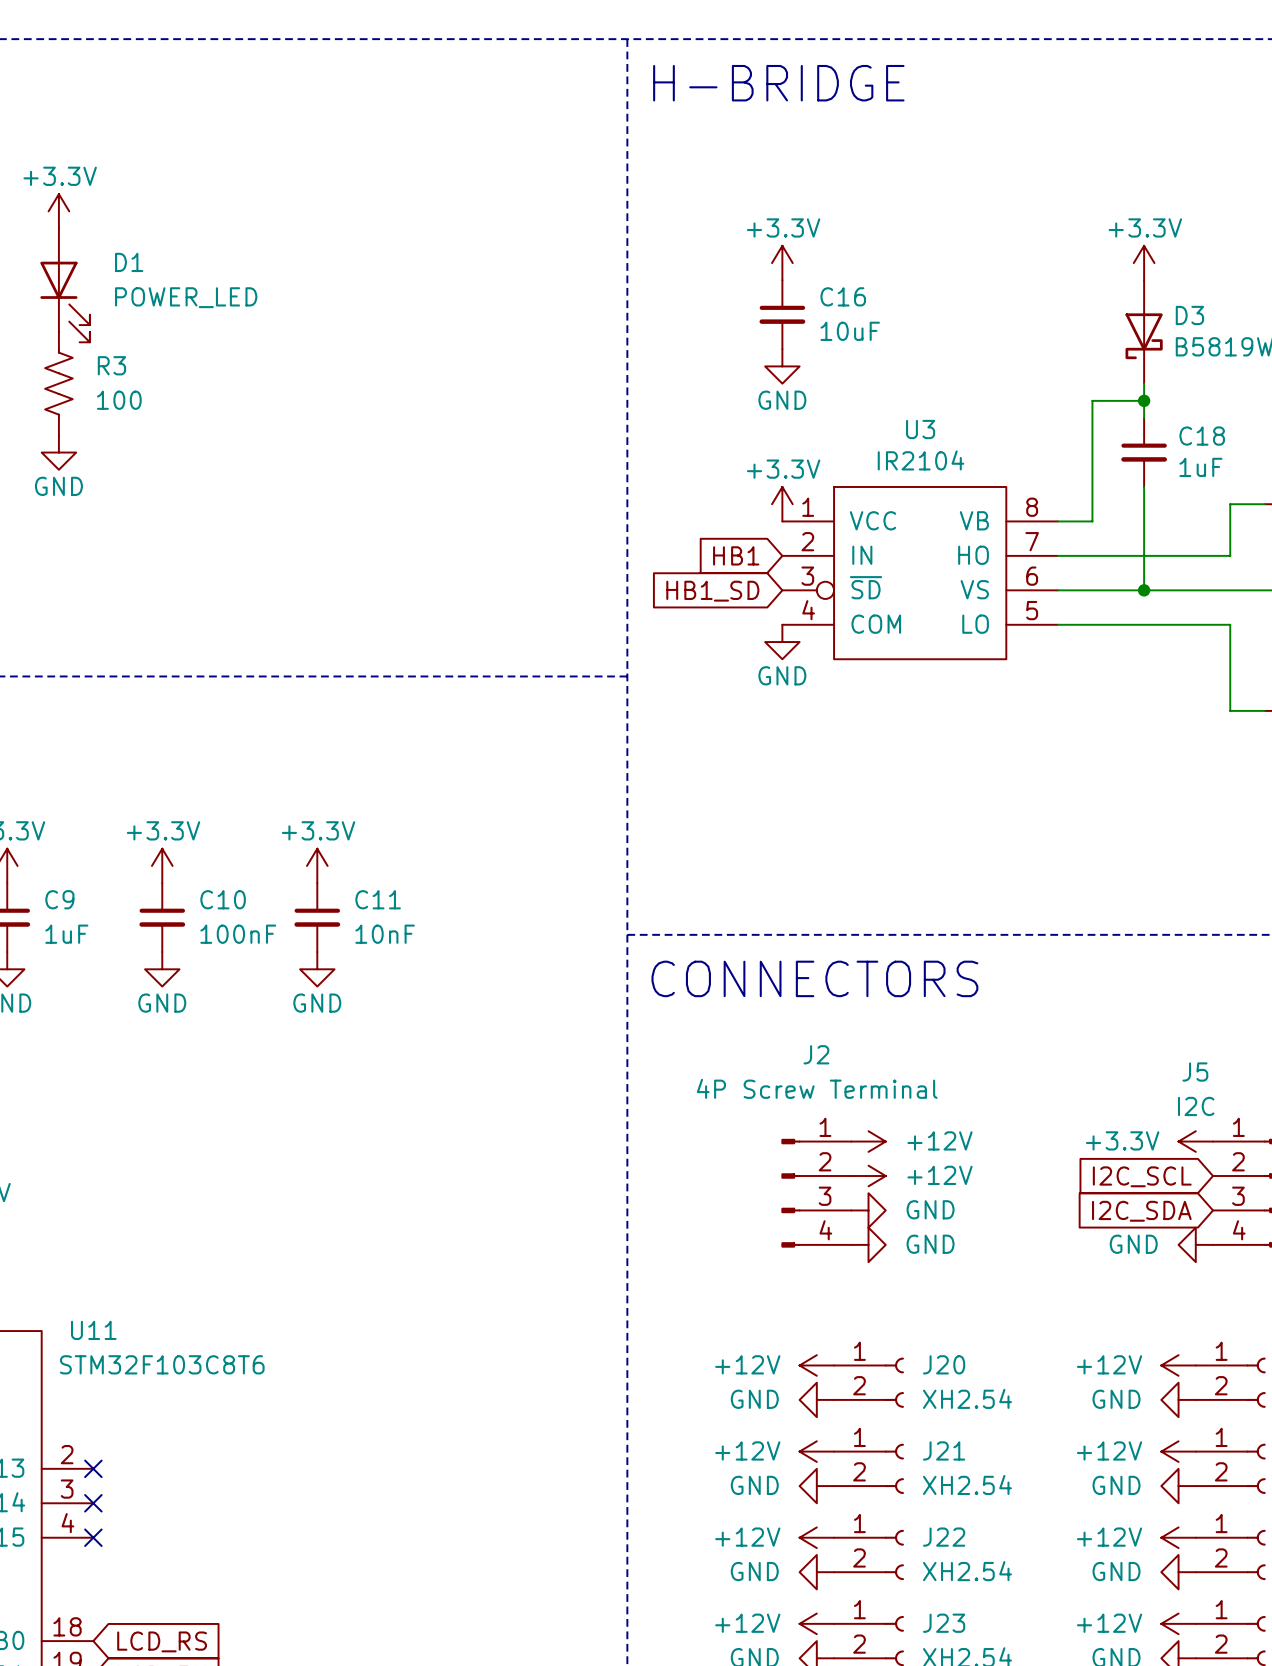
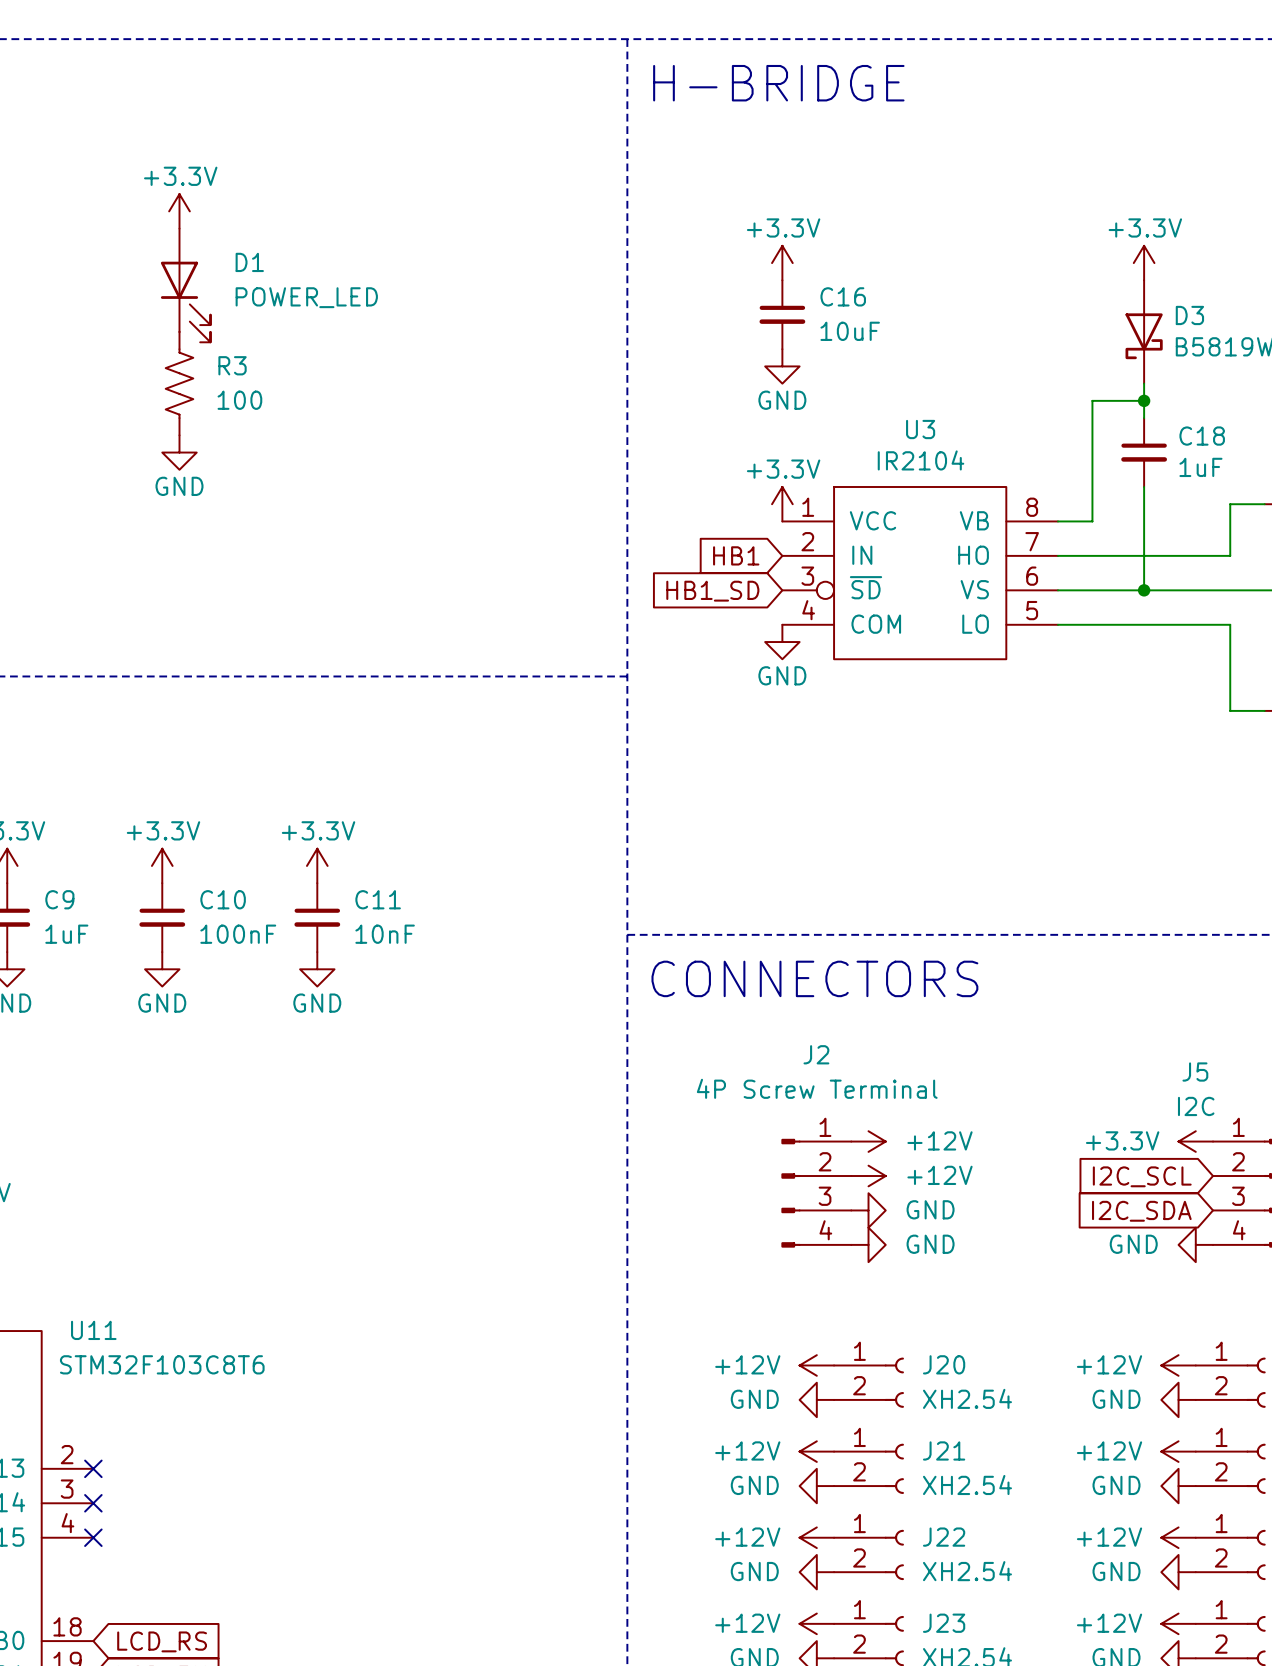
power symbol position: +3.3V (58, 211) -> +3.3V (179, 211)
D1 position: (65, 285) -> (185, 285)
R3 position: (58, 383) -> (179, 383)
power symbol position: GND (58, 452) -> GND (179, 452)

